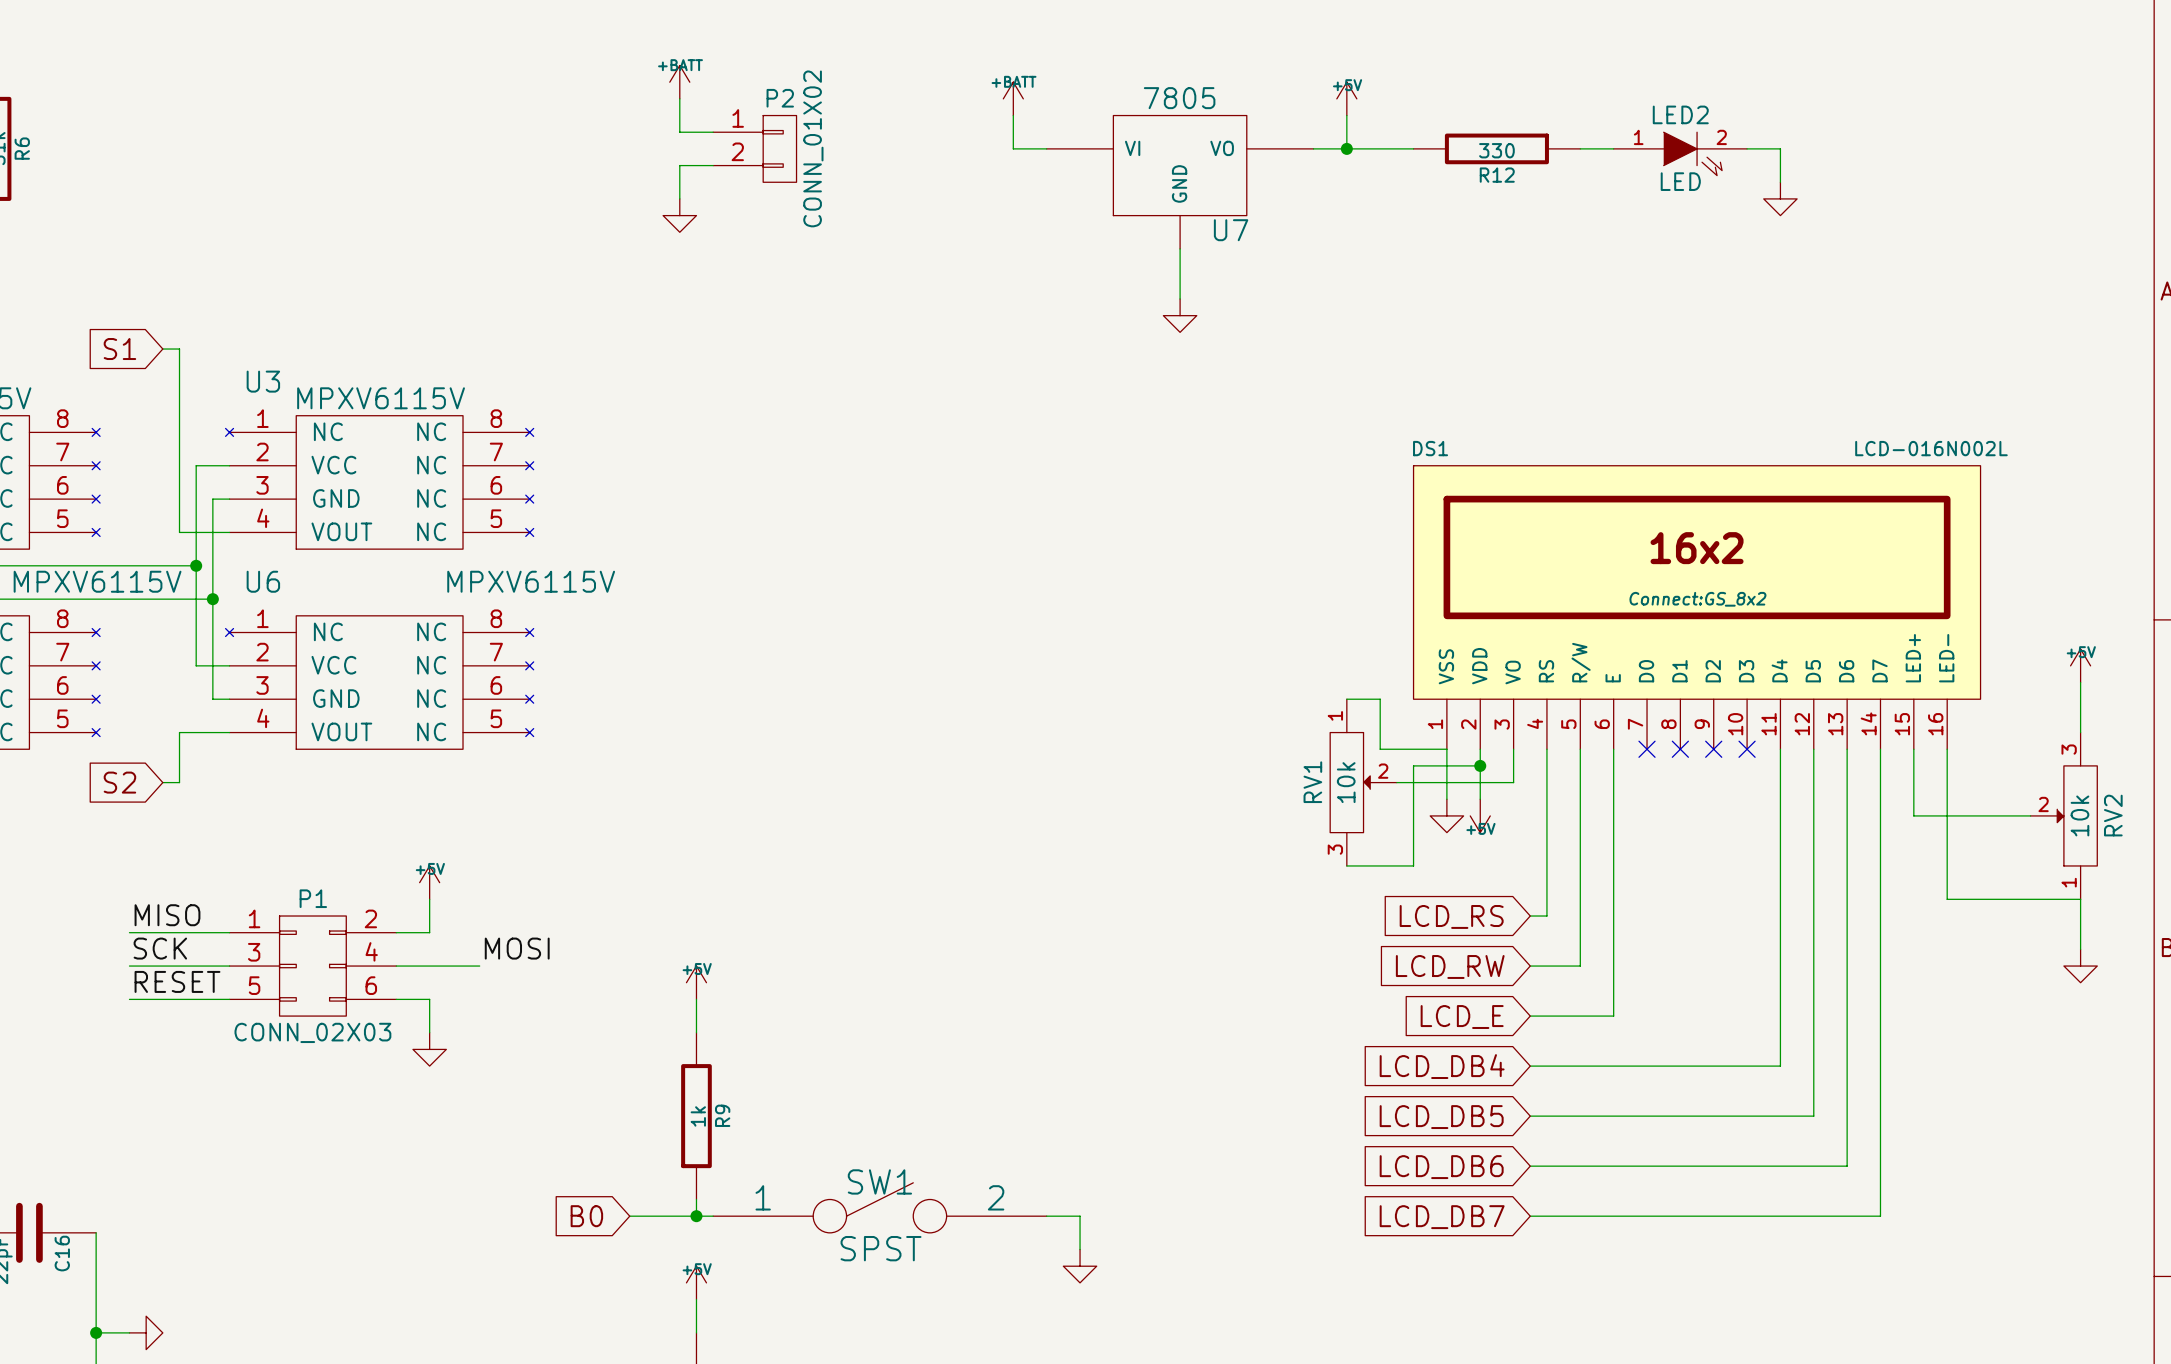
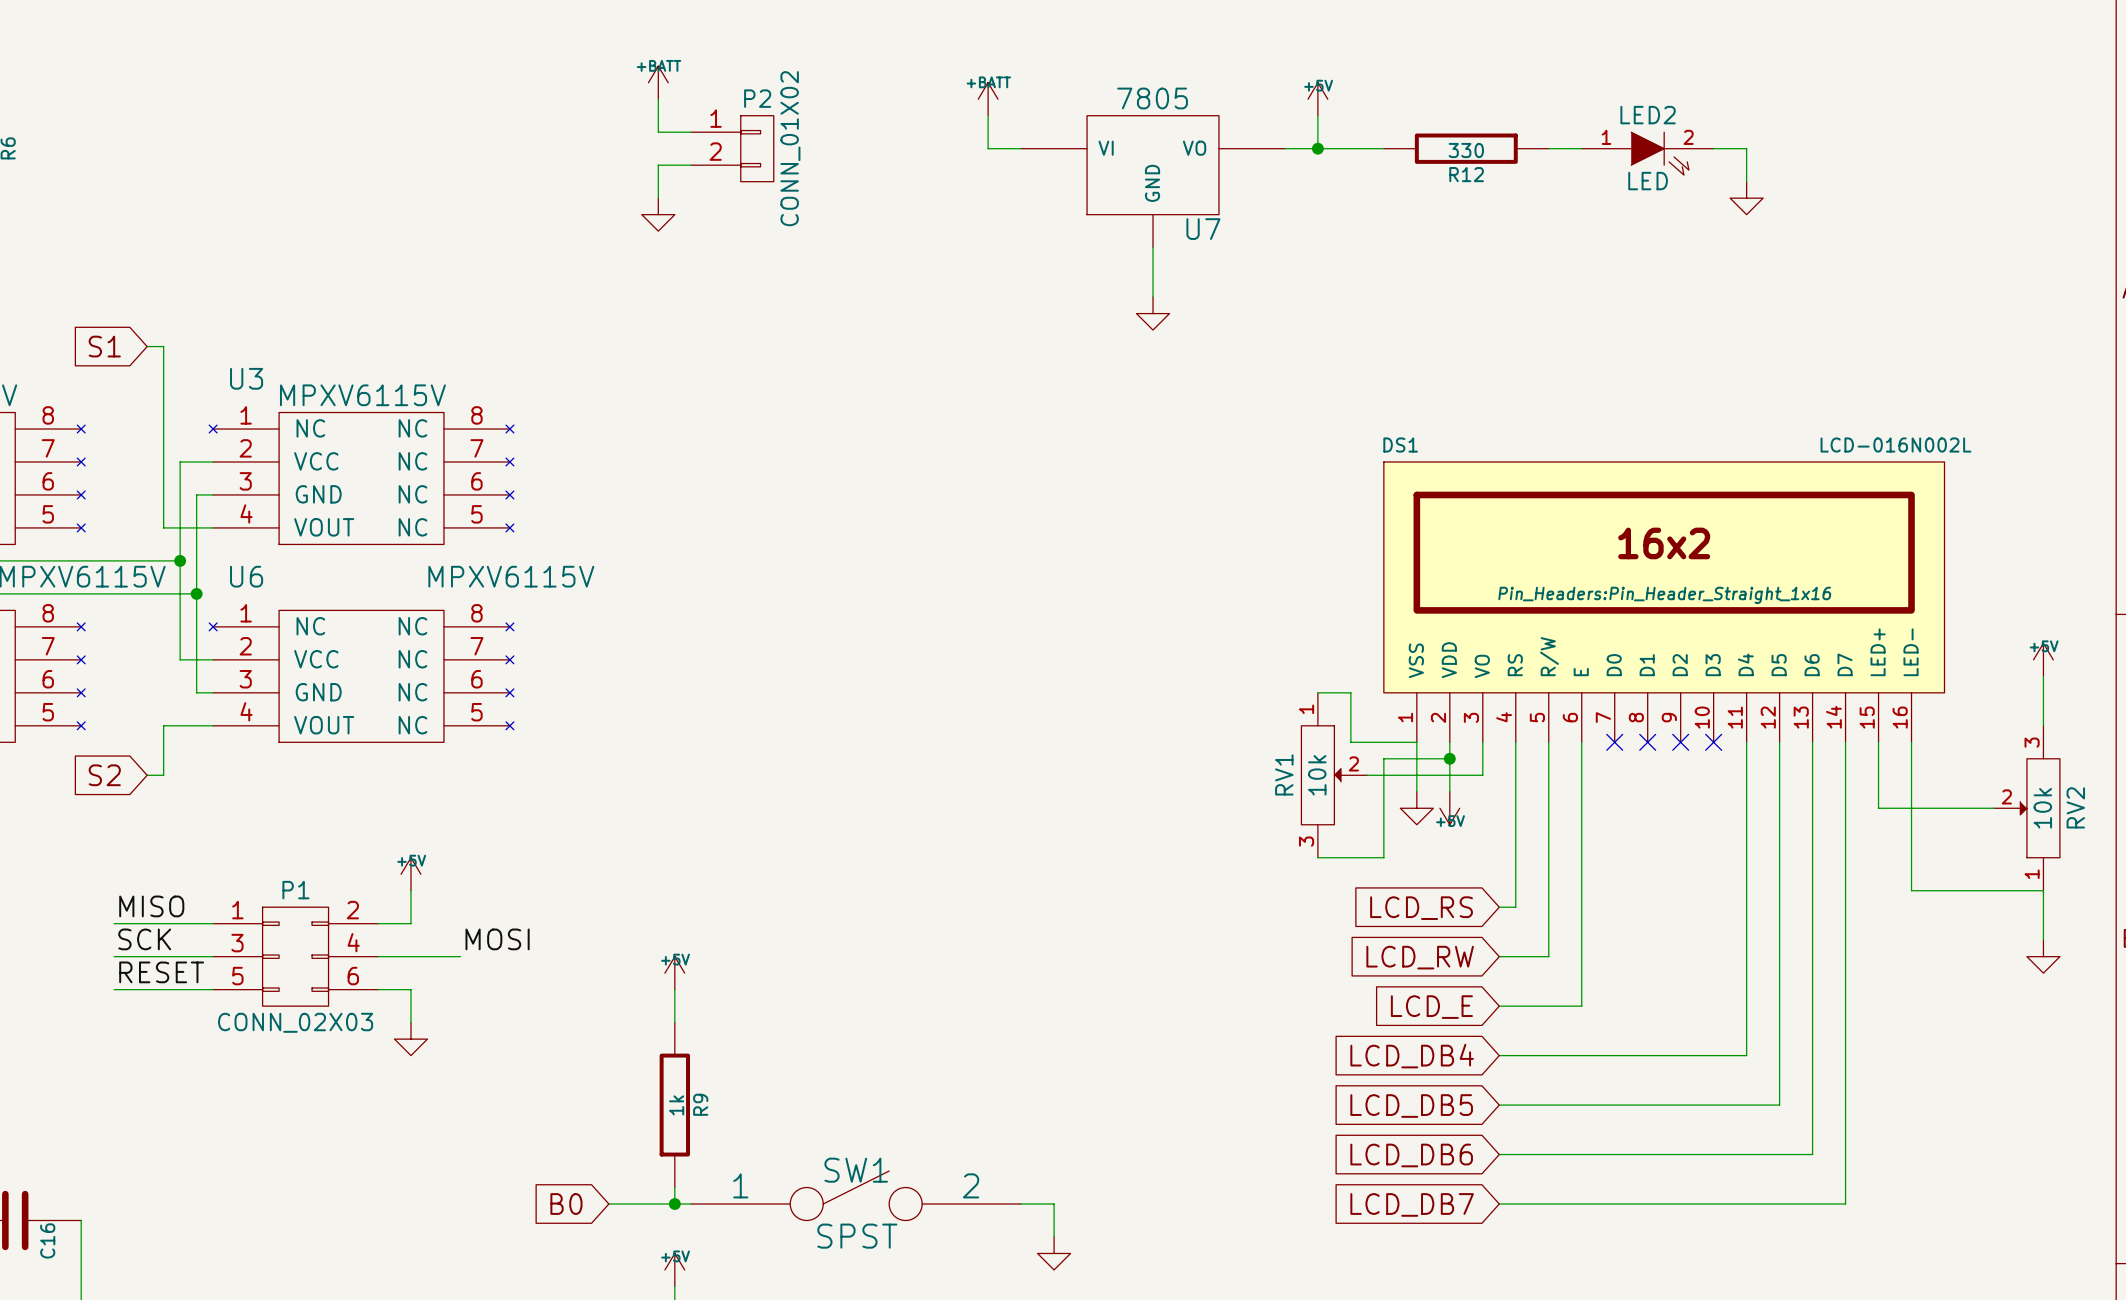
DS1 text: Connect:GS_8x2 (1697, 599) -> Pin_Headers:Pin_Header_Straight_1x16 (1664, 595)

